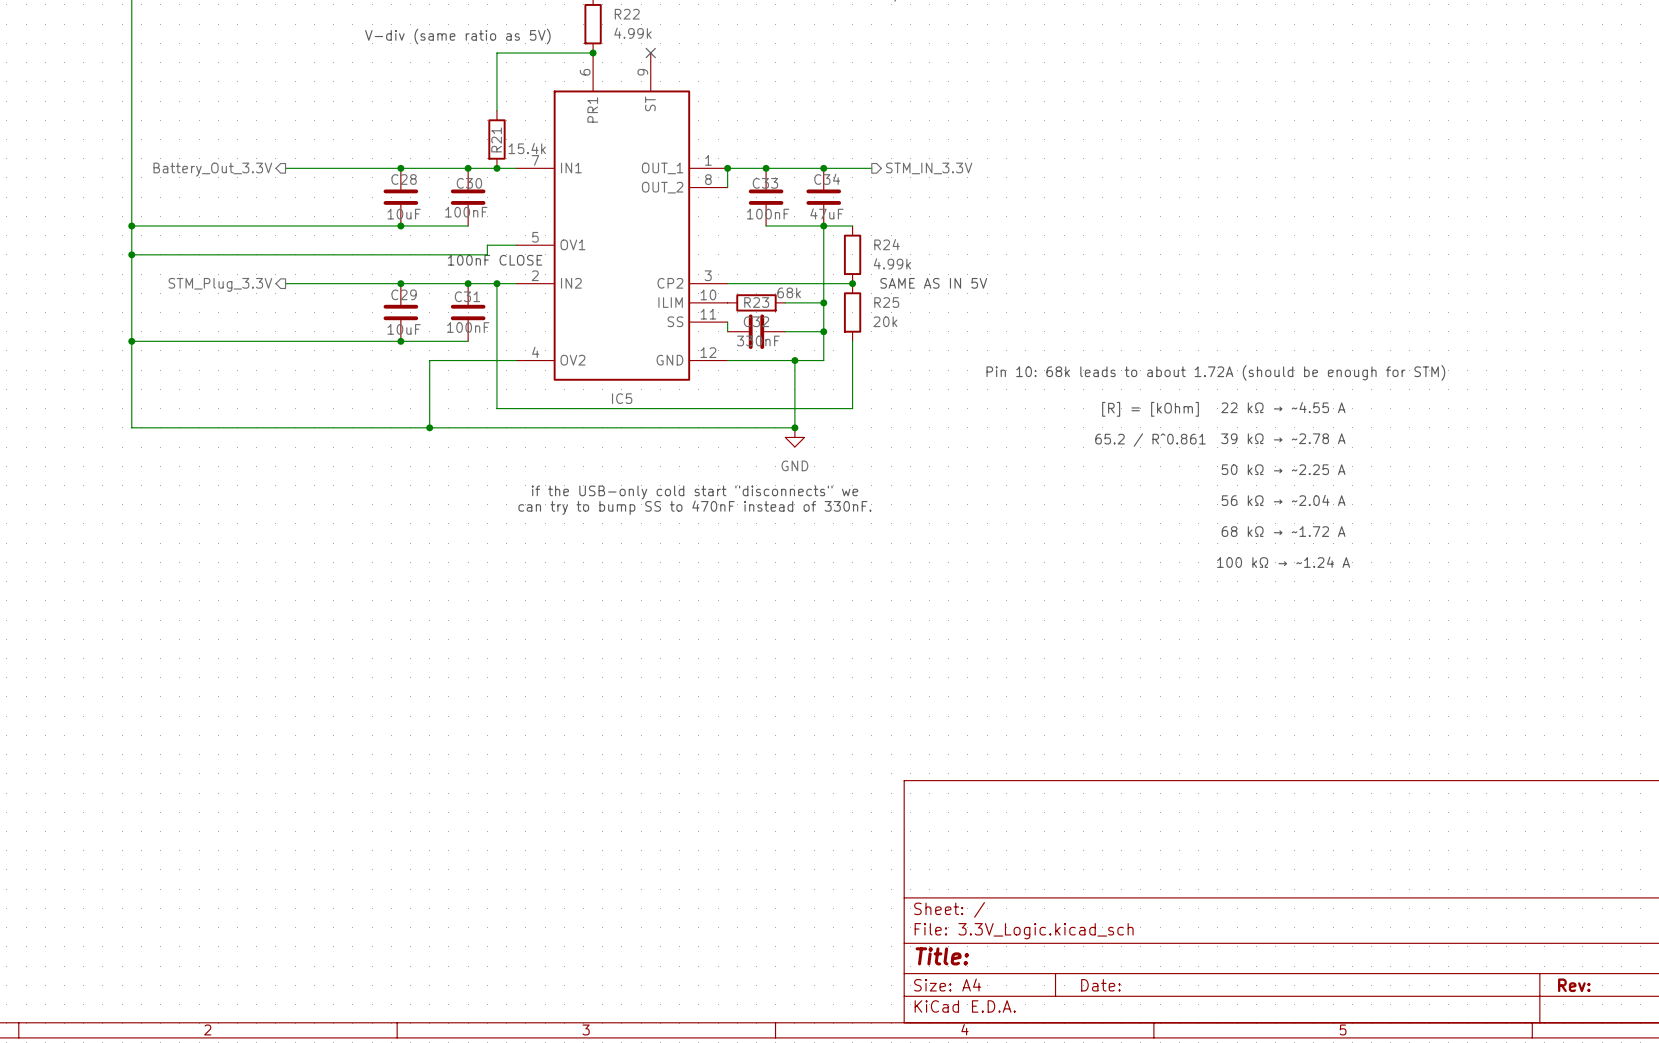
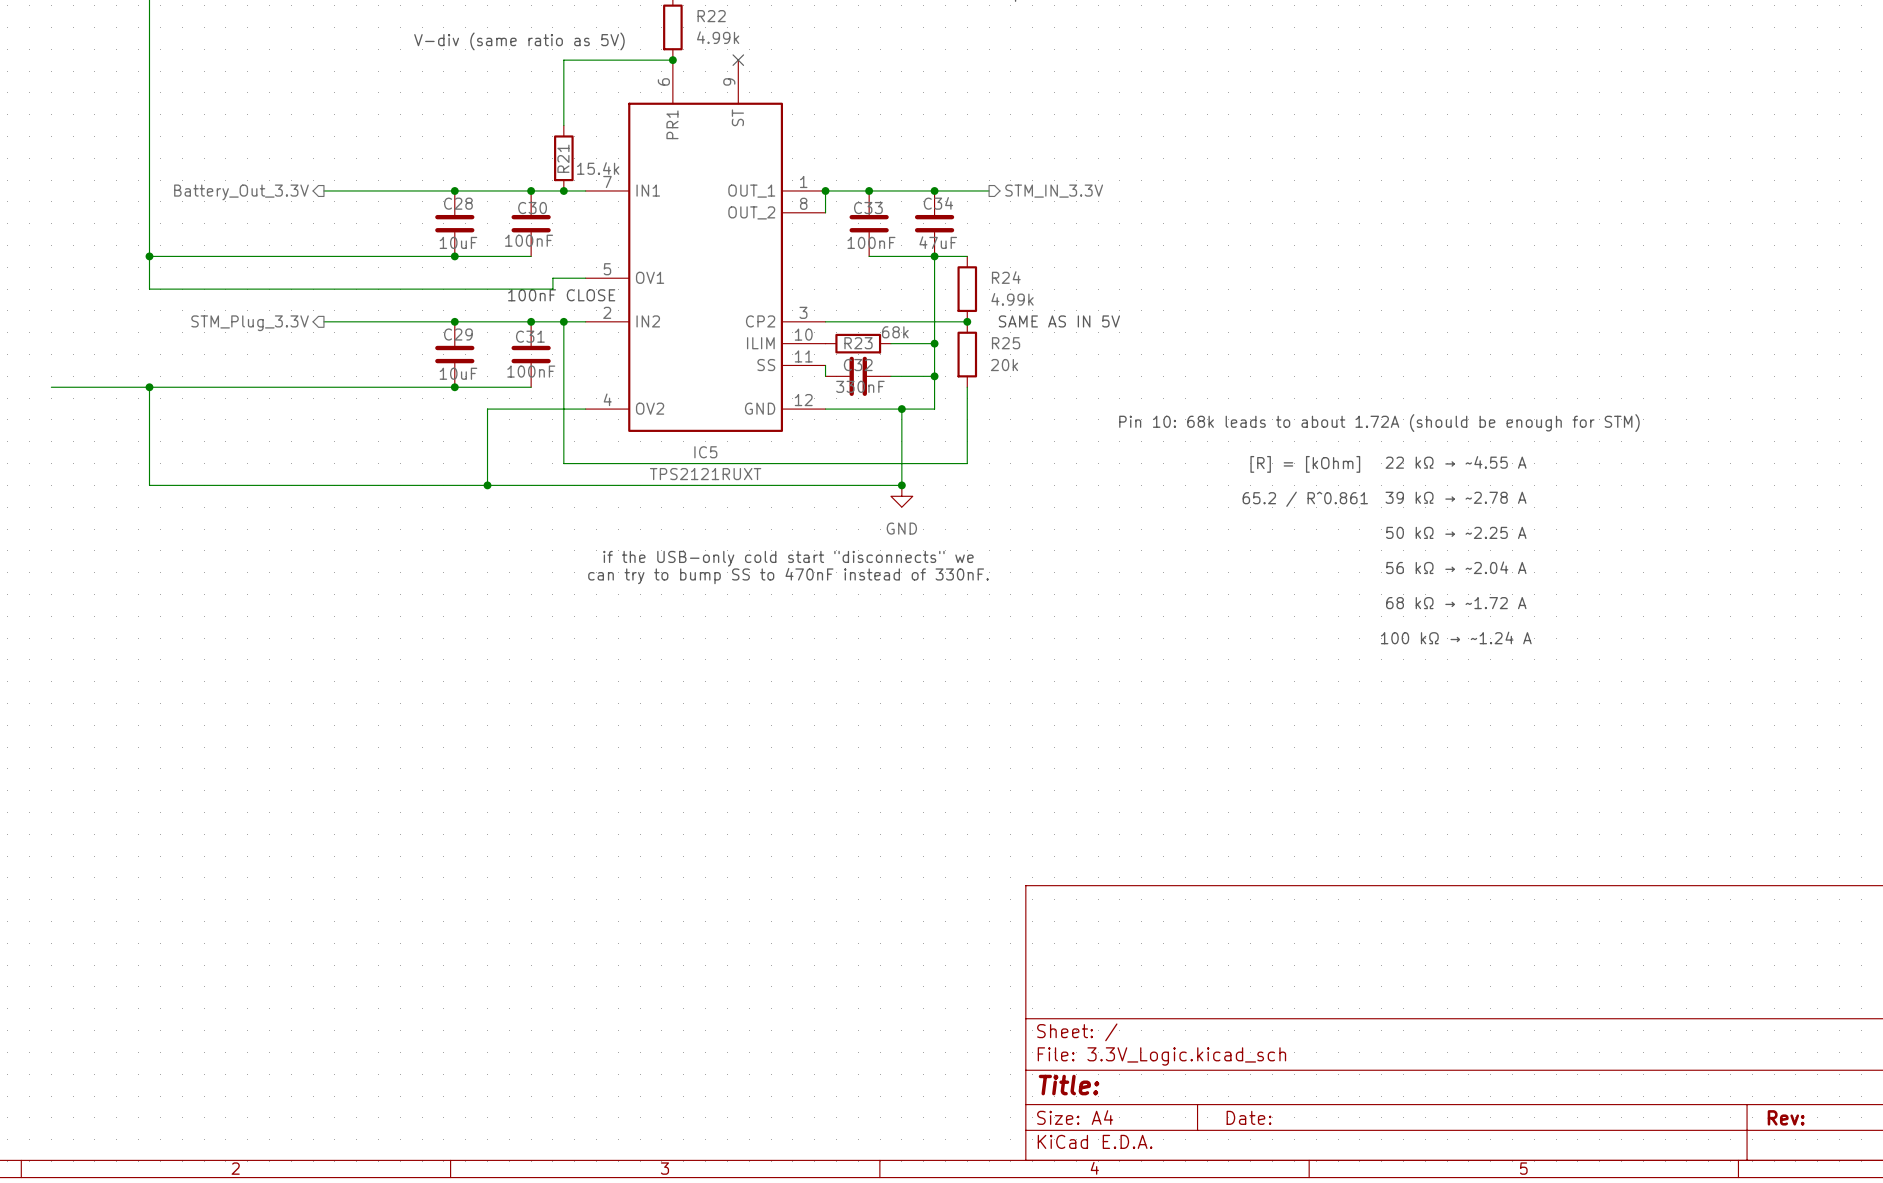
wire: (131, 254) (131, 341) -> (51, 387) (149, 387)
junction: (131, 254) -> none
IC5 value: none -> TPS2121RUXT (705, 474)

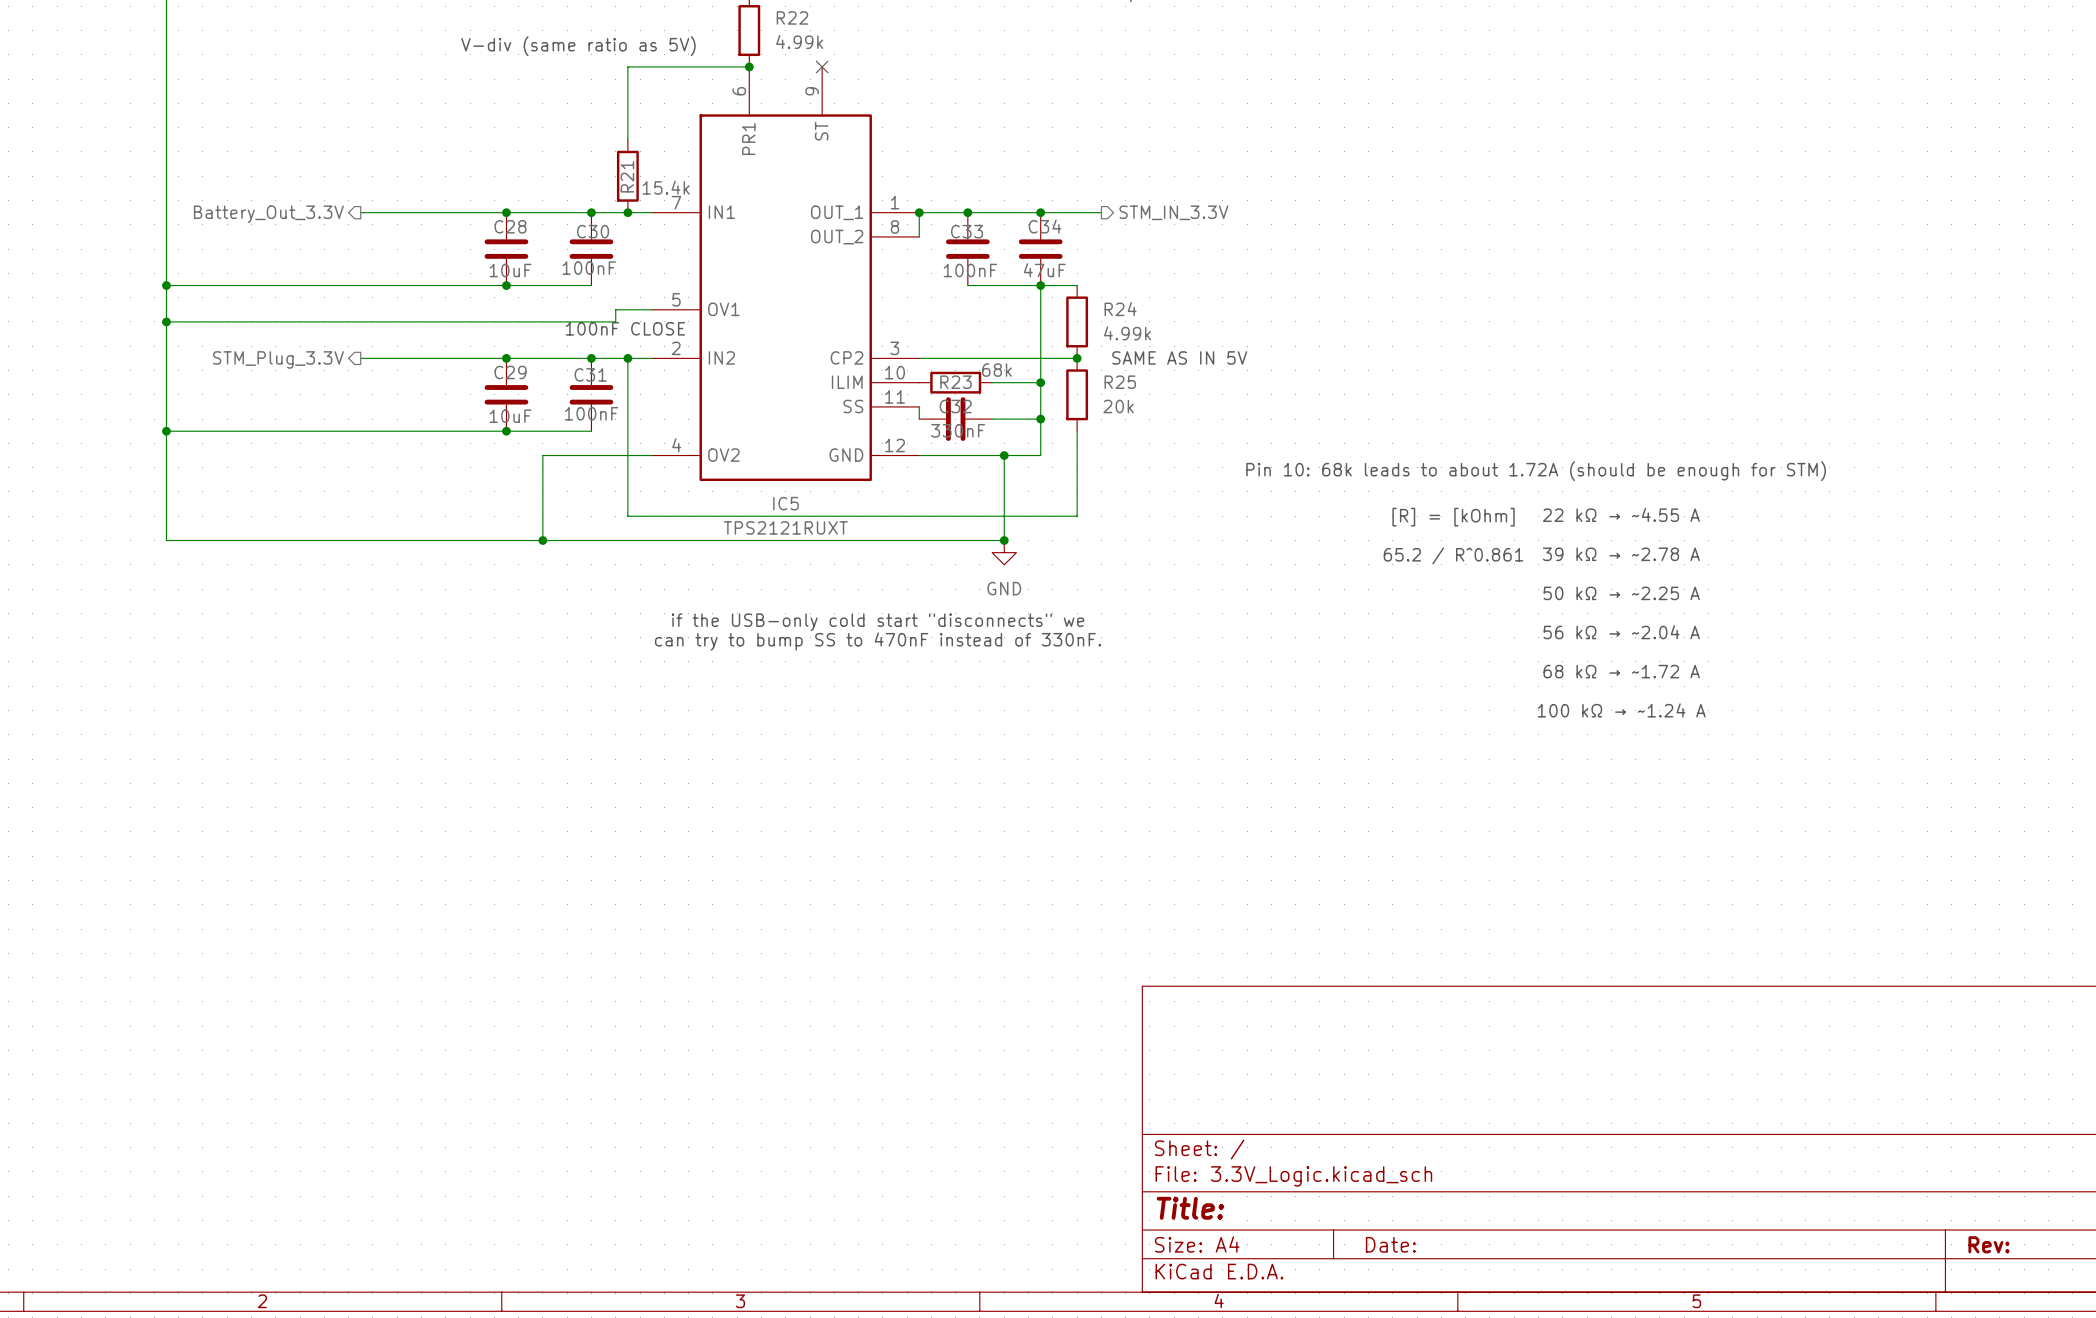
junction: none -> (166, 321)
wire: (51, 387) (149, 387) -> (166, 321) (166, 431)

